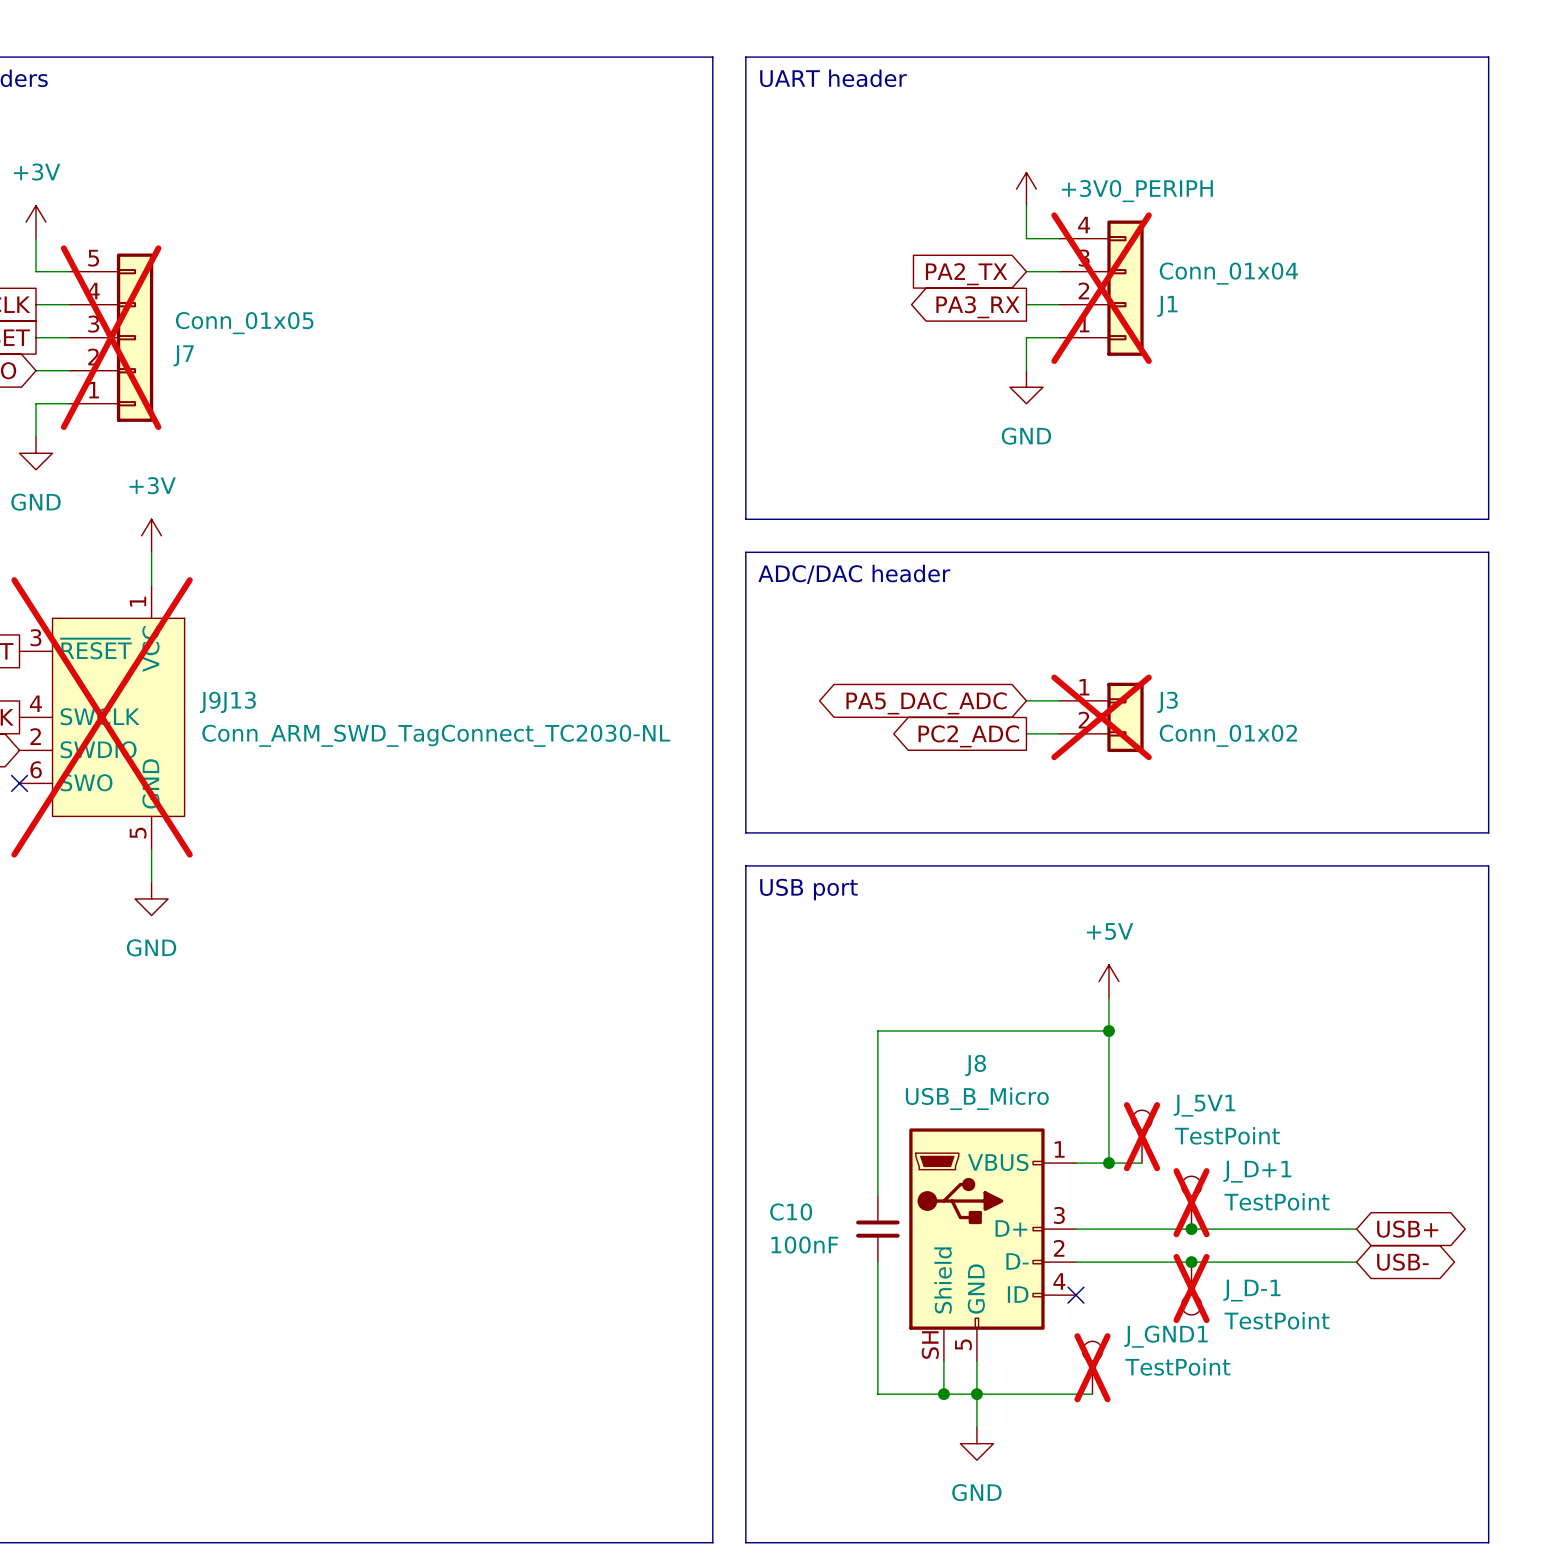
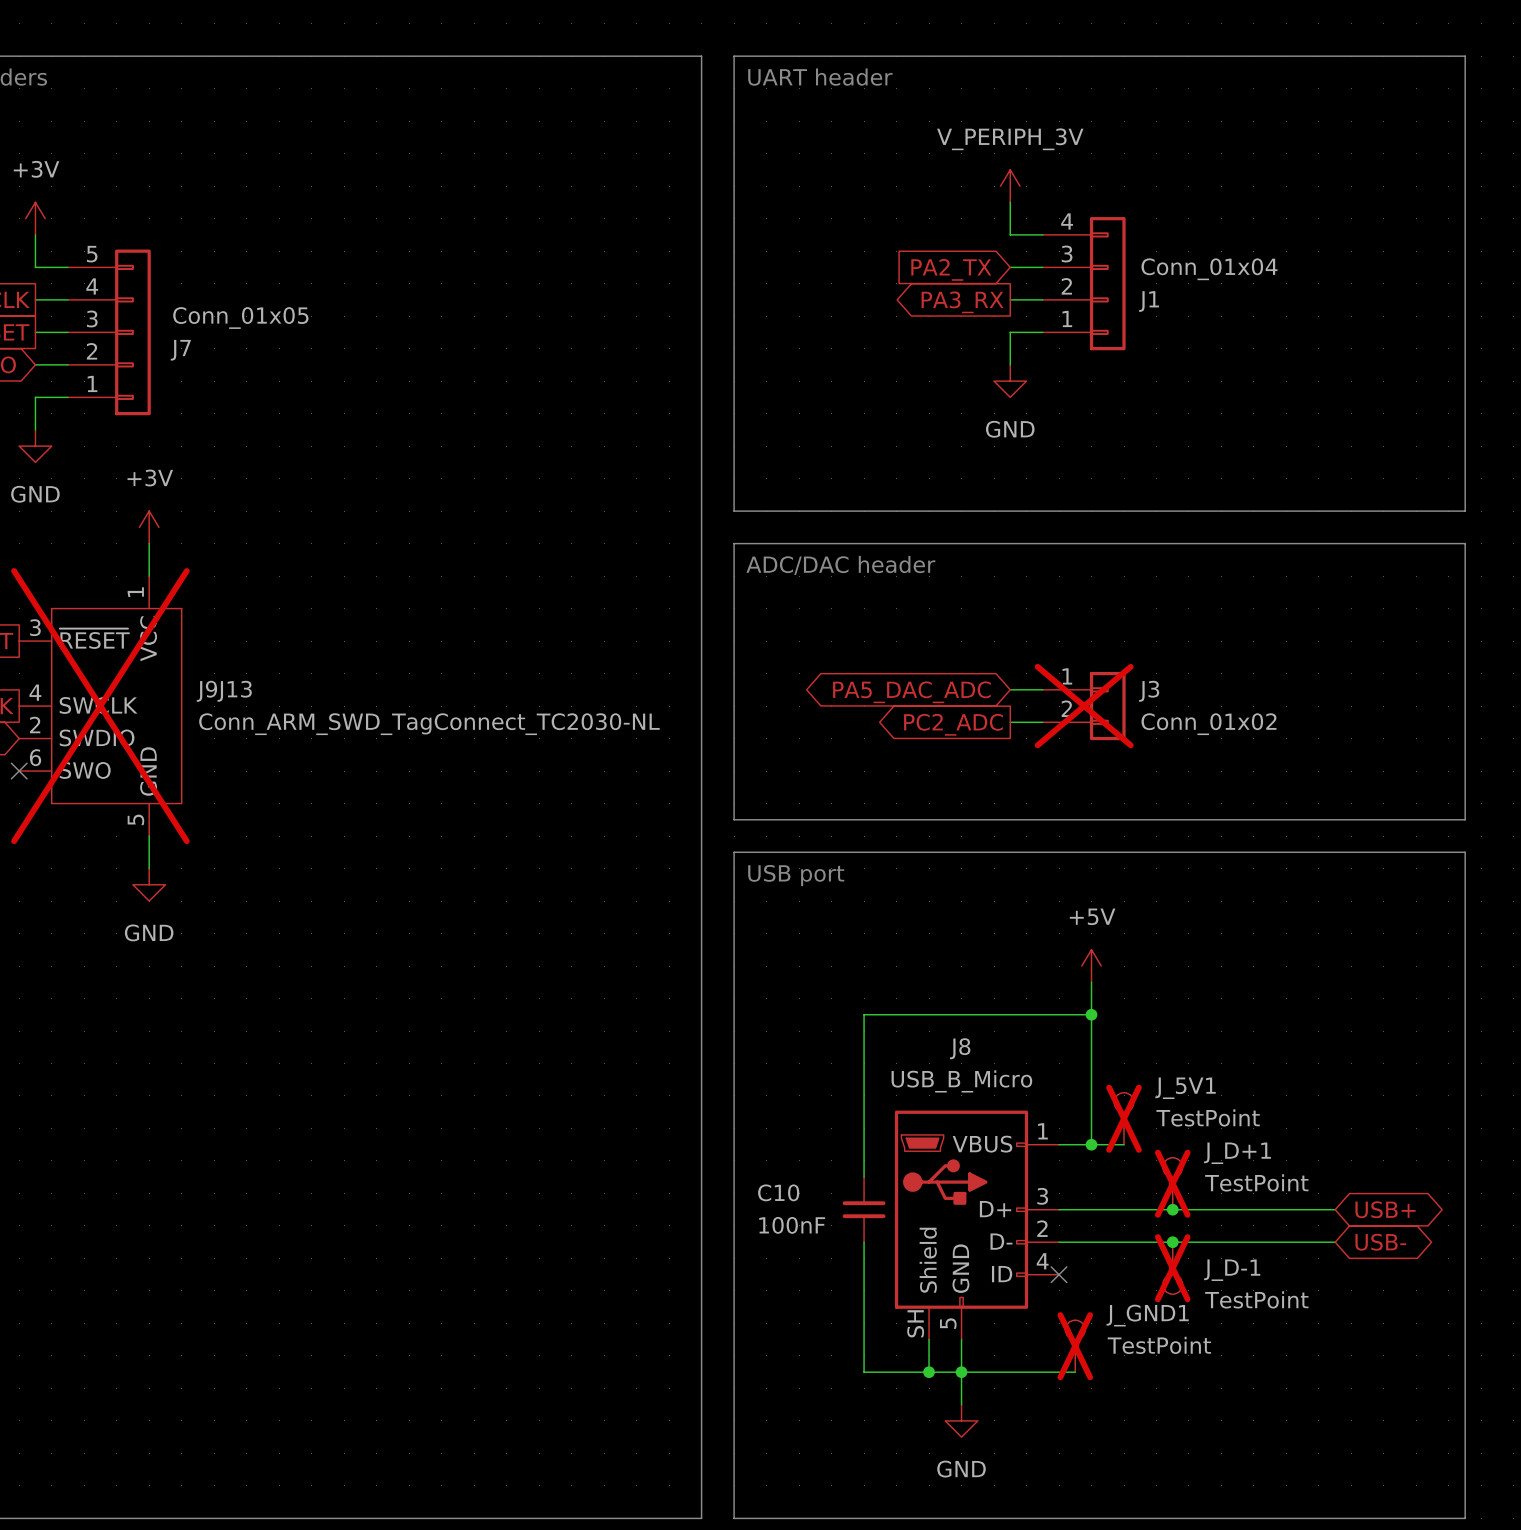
power symbol: +3V0_PERIPH (1026, 189) -> V_PERIPH_3V (1010, 186)
J1 do-not-place cross: (1101, 288) -> none
J7 do-not-place cross: (111, 337) -> none

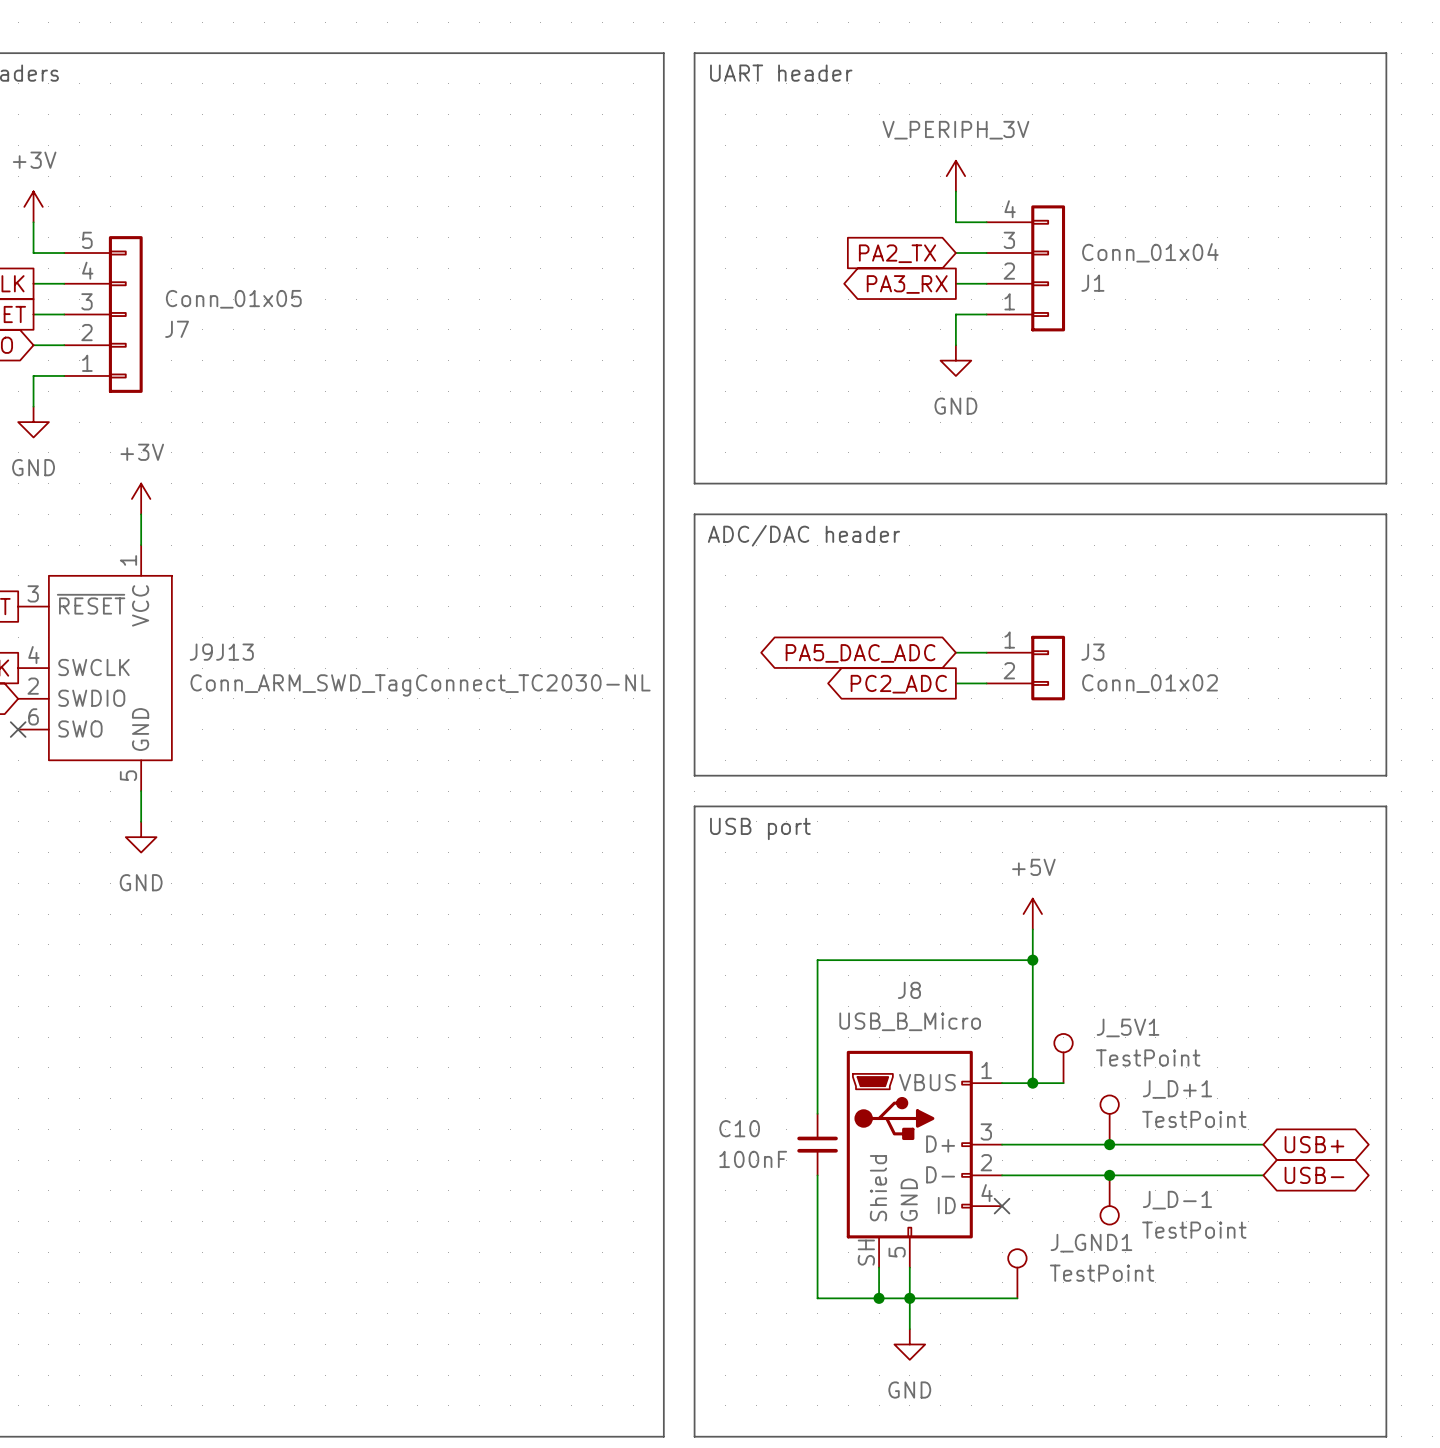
J9J13 do-not-place cross: (100, 706) -> none
J3 do-not-place cross: (1084, 706) -> none
J_5V1 do-not-place cross: (1124, 1118) -> none
J_D+1 do-not-place cross: (1172, 1183) -> none
J_D-1 do-not-place cross: (1172, 1268) -> none
J_GND1 do-not-place cross: (1075, 1346) -> none

